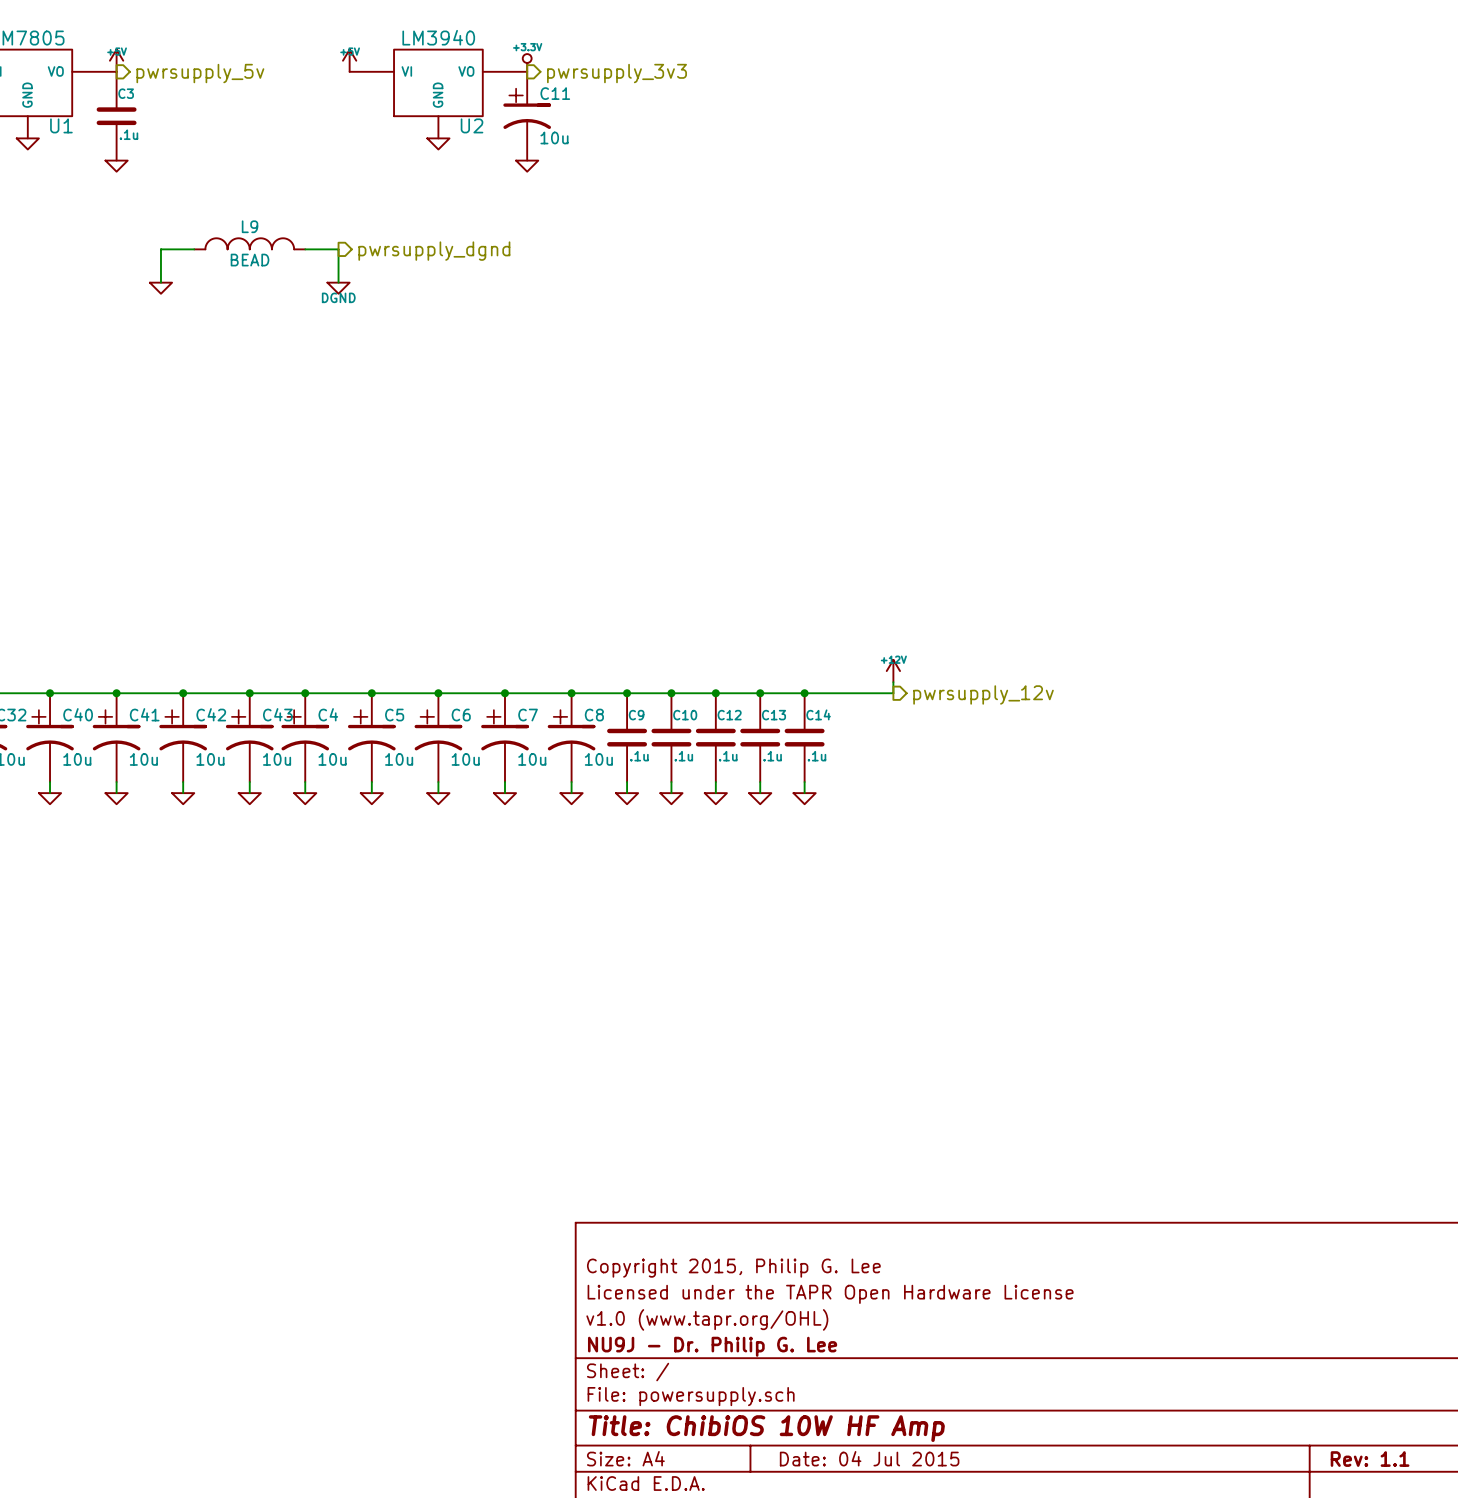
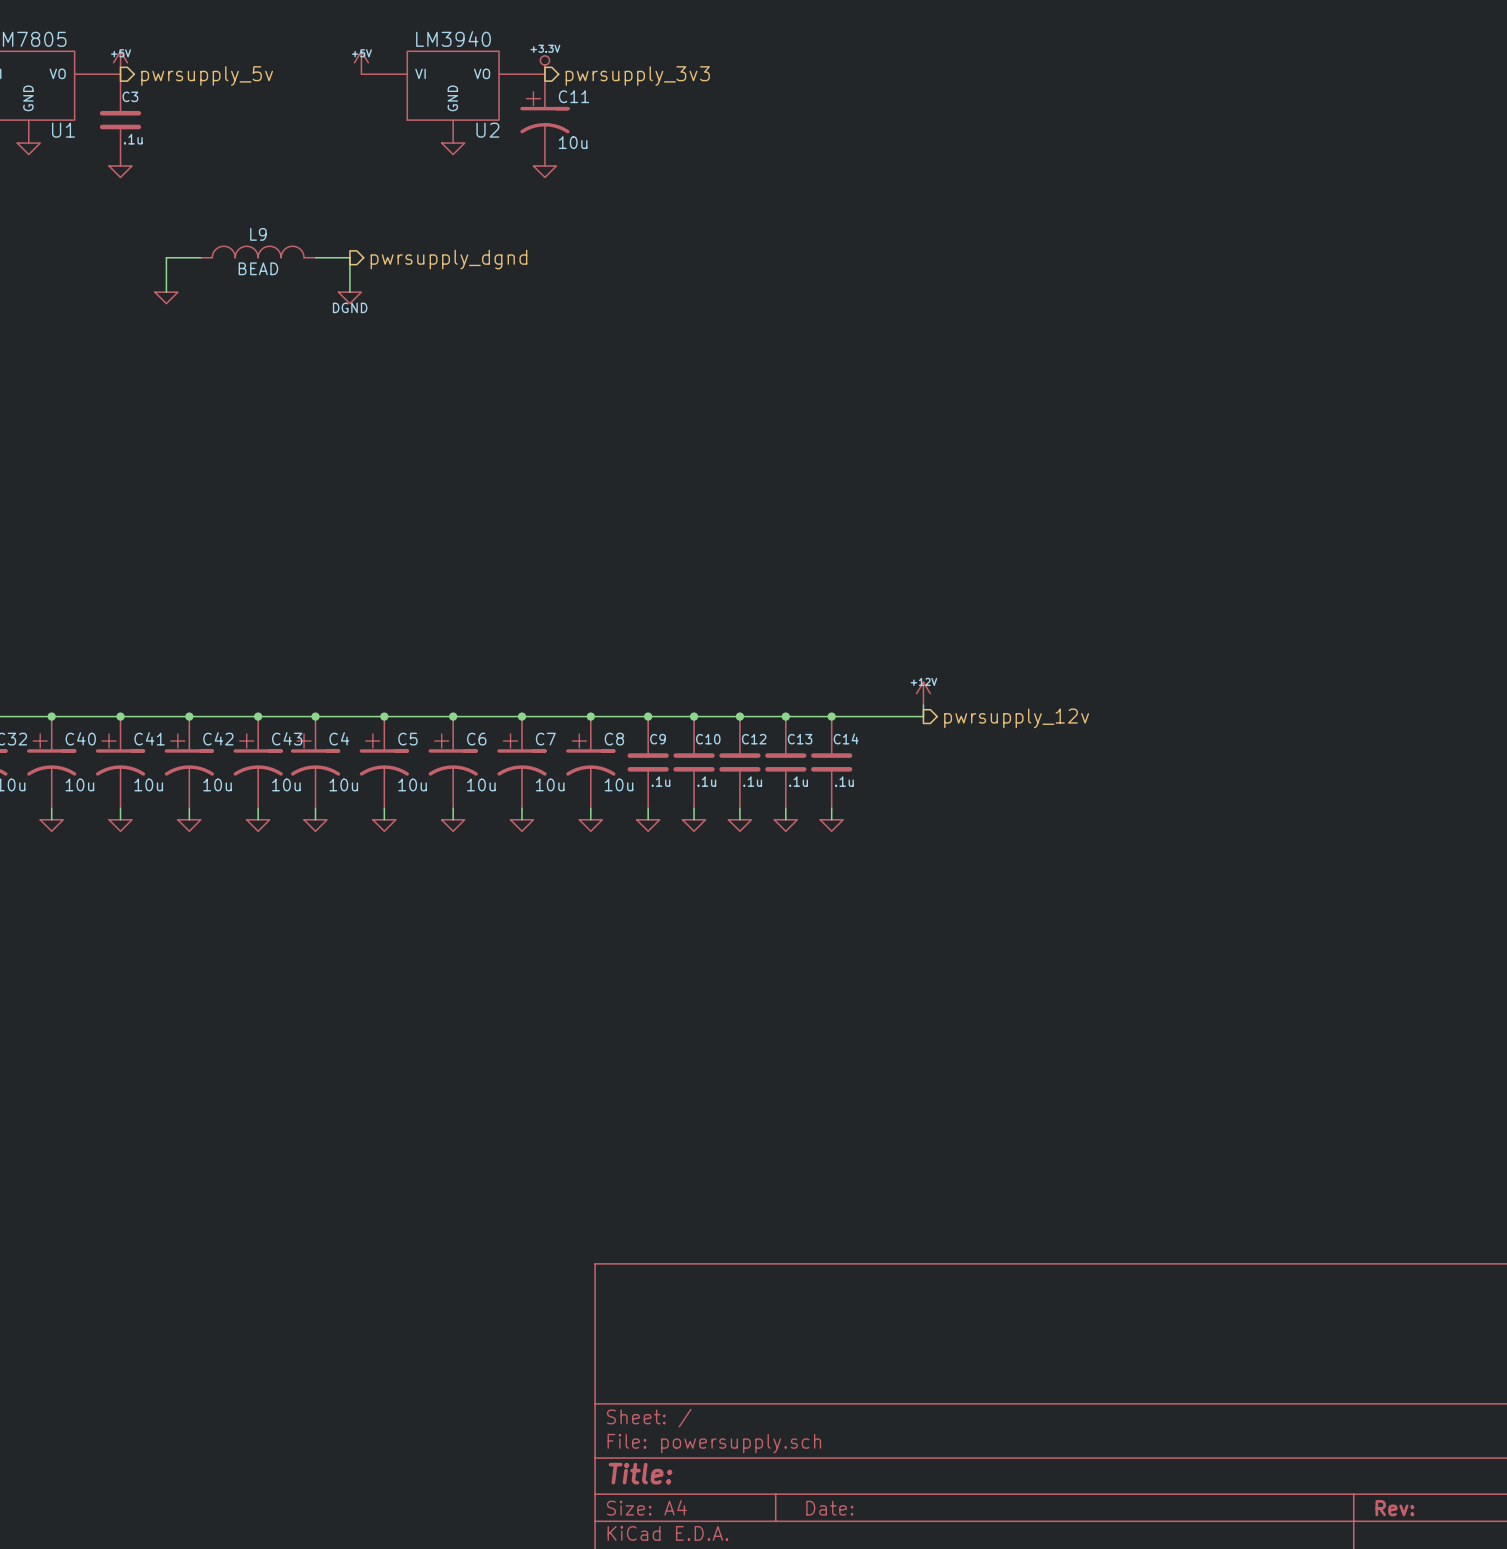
title block: Copyright 2015, Philip G. Lee (733, 1268) -> none
title block: Licensed under the TAPR Open Hardware License (830, 1294) -> none
title block: v1.0 (www.tapr.org/OHL) (707, 1319) -> none
title block: NU9J - Dr. Philip G. Lee (712, 1346) -> none
title block: Title: ChibiOS 10W HF Amp (766, 1428) -> Title: (640, 1473)
title block: Date: 04 Jul 2015 (869, 1458) -> Date: (829, 1508)
title block: Rev: 1.1 (1370, 1459) -> Rev: (1394, 1508)

